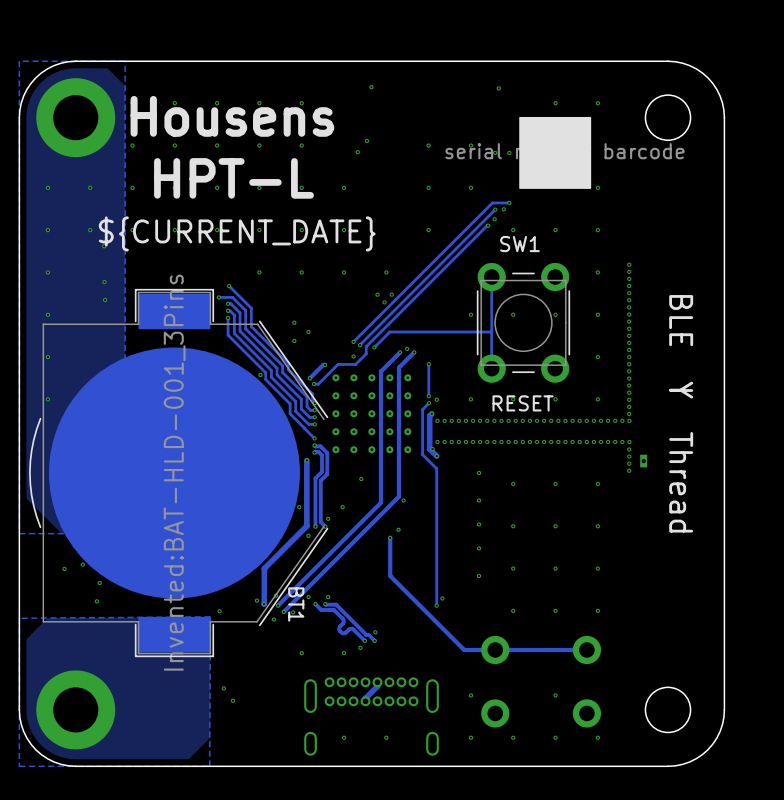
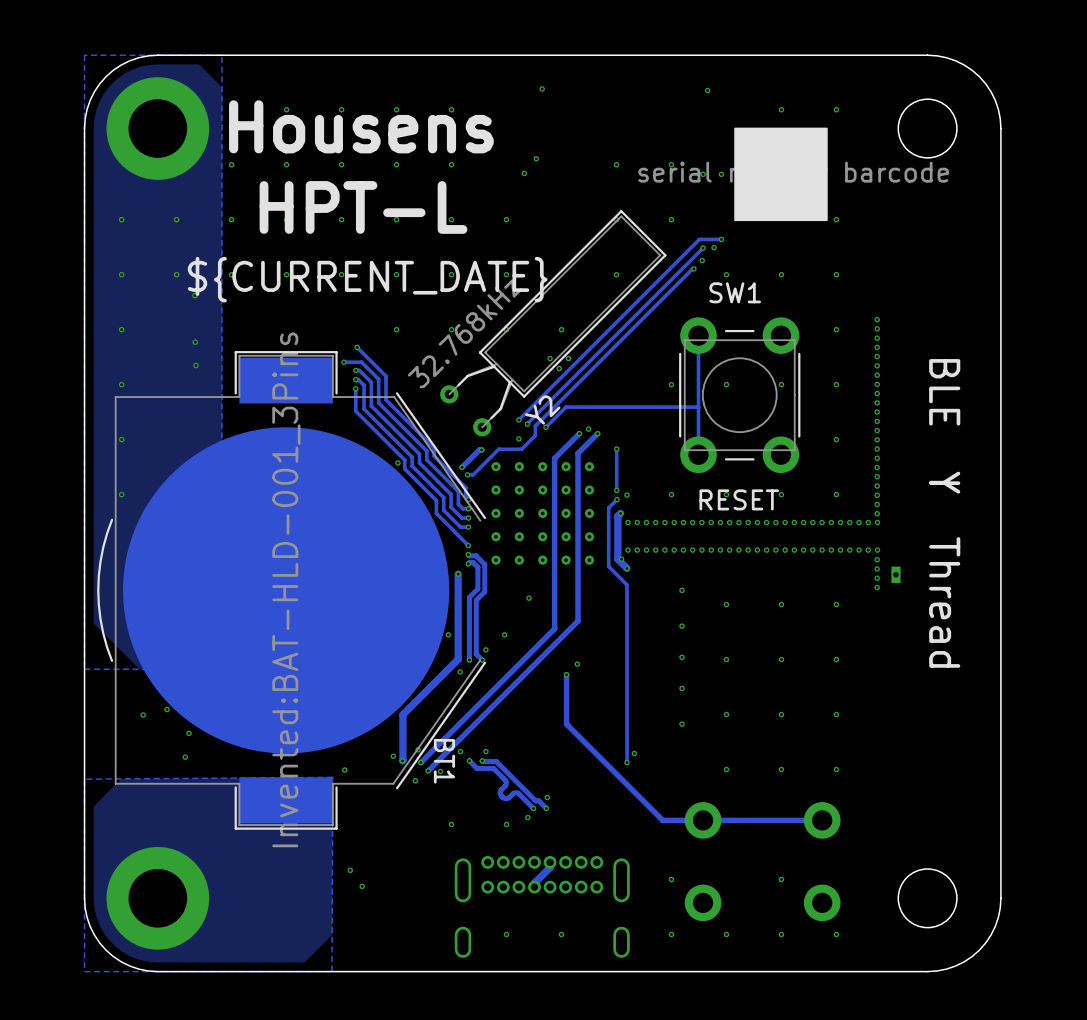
Y2: none -> 32.768kHz (553, 323)
via: (294, 322) -> none
via: (308, 332) -> none
via: (294, 341) -> none
via: (403, 500) -> none

